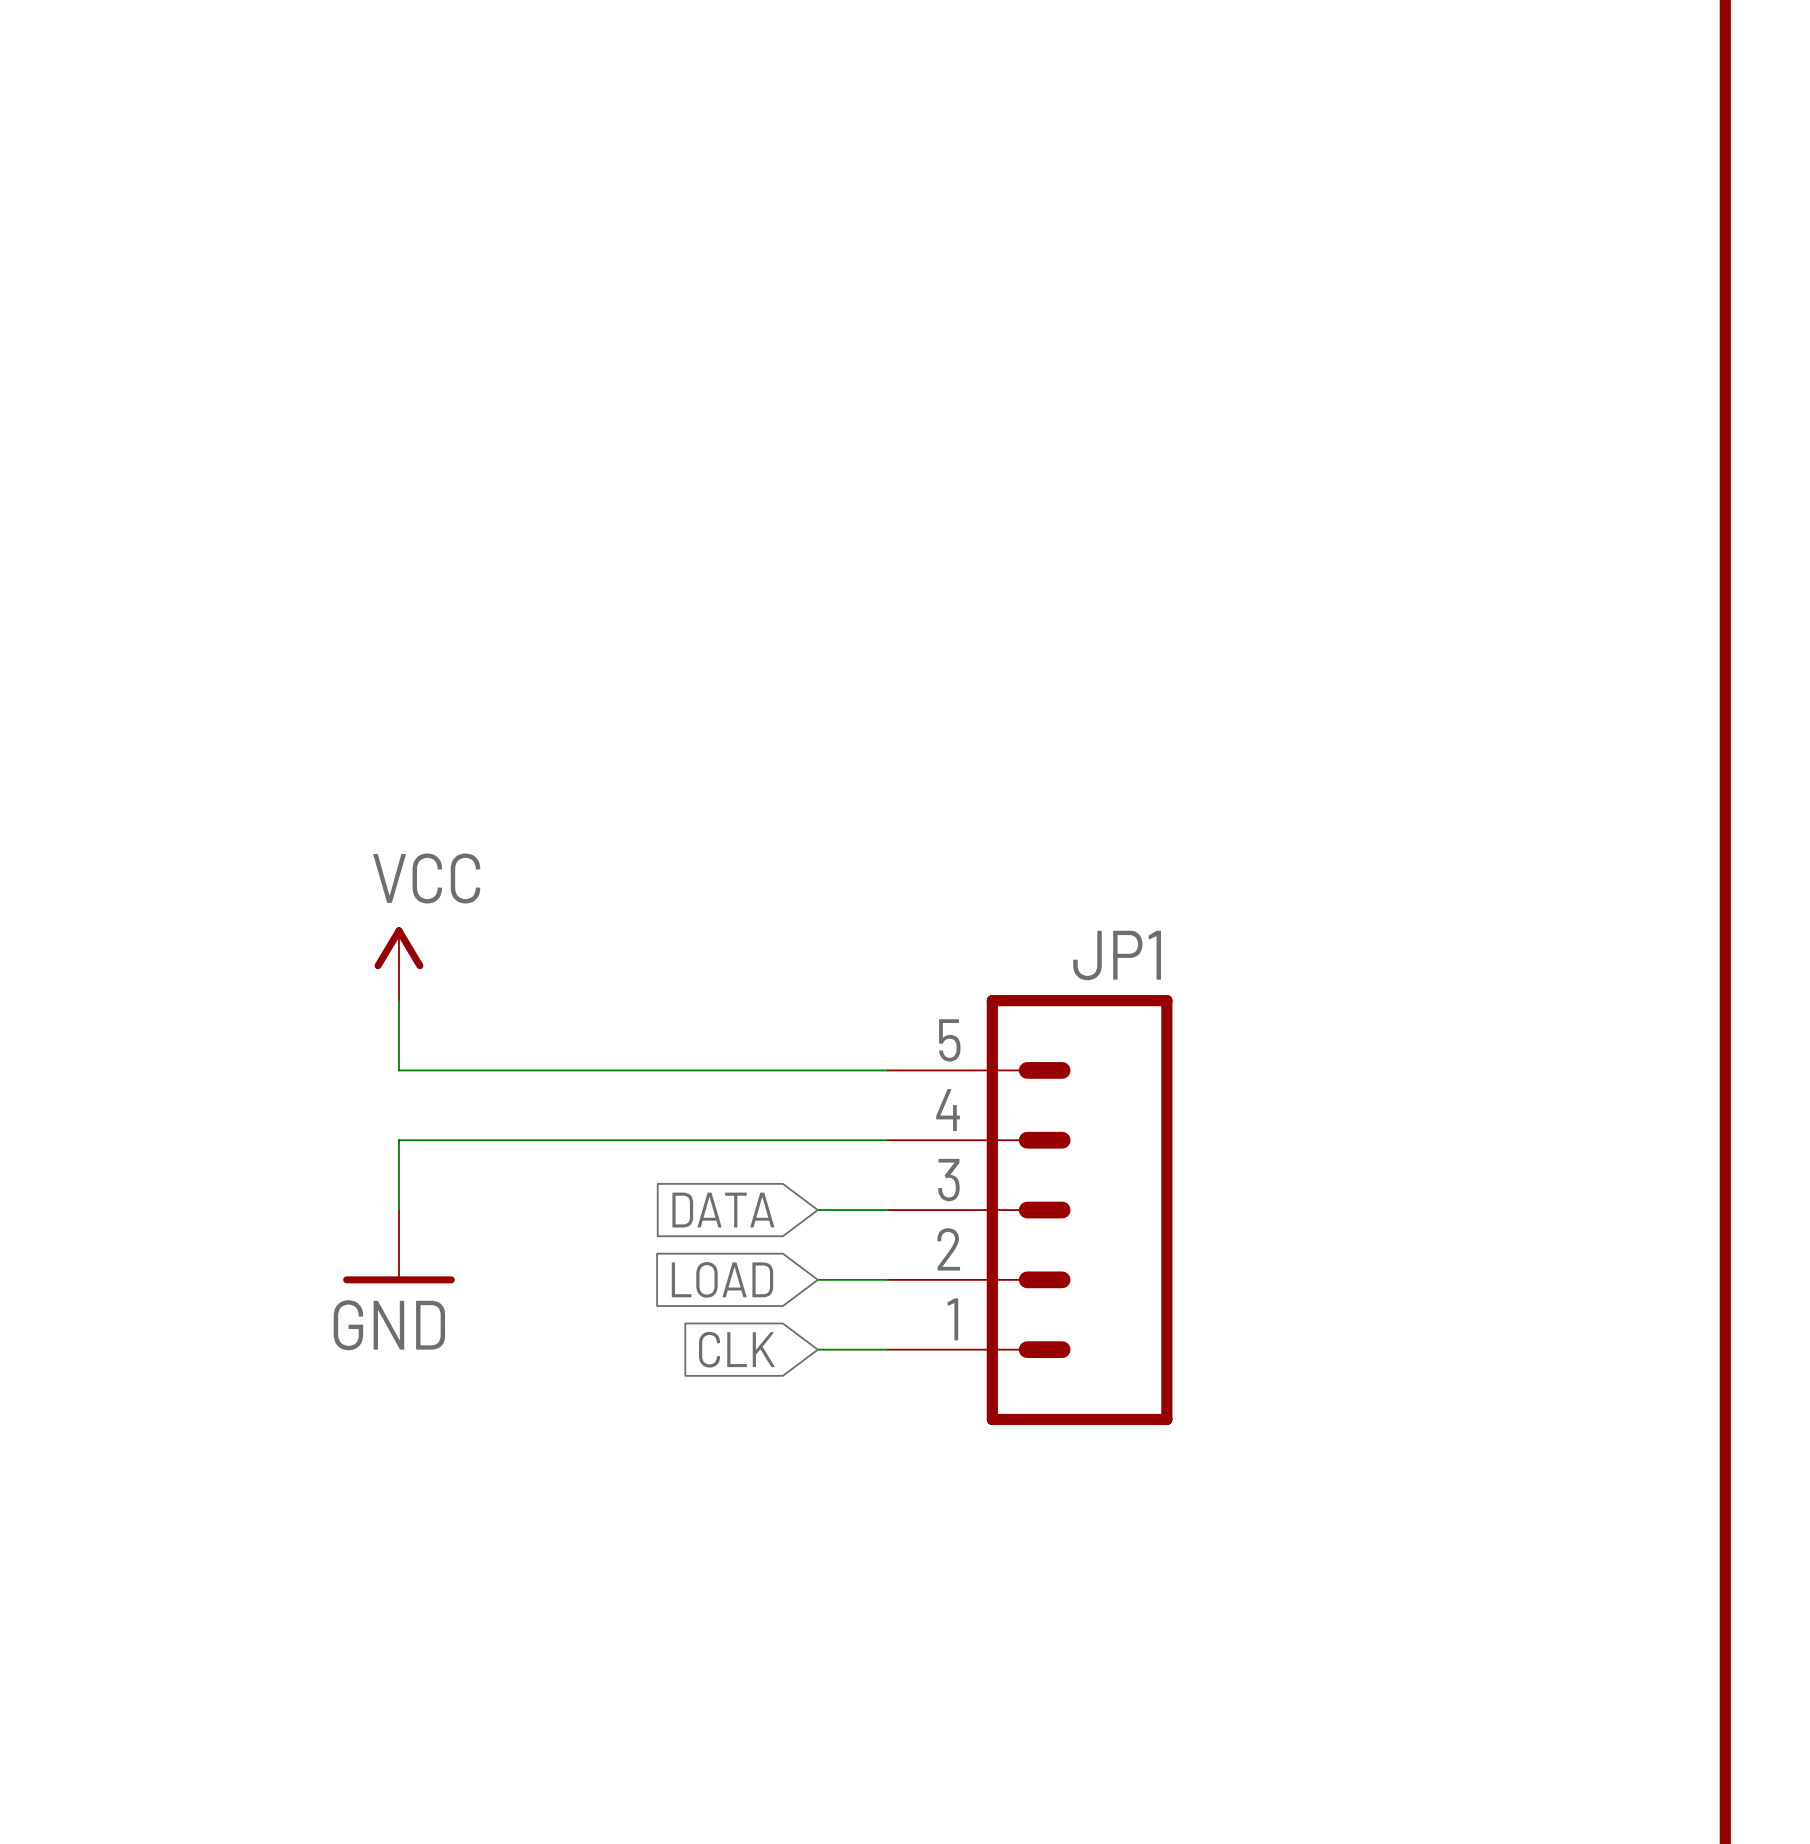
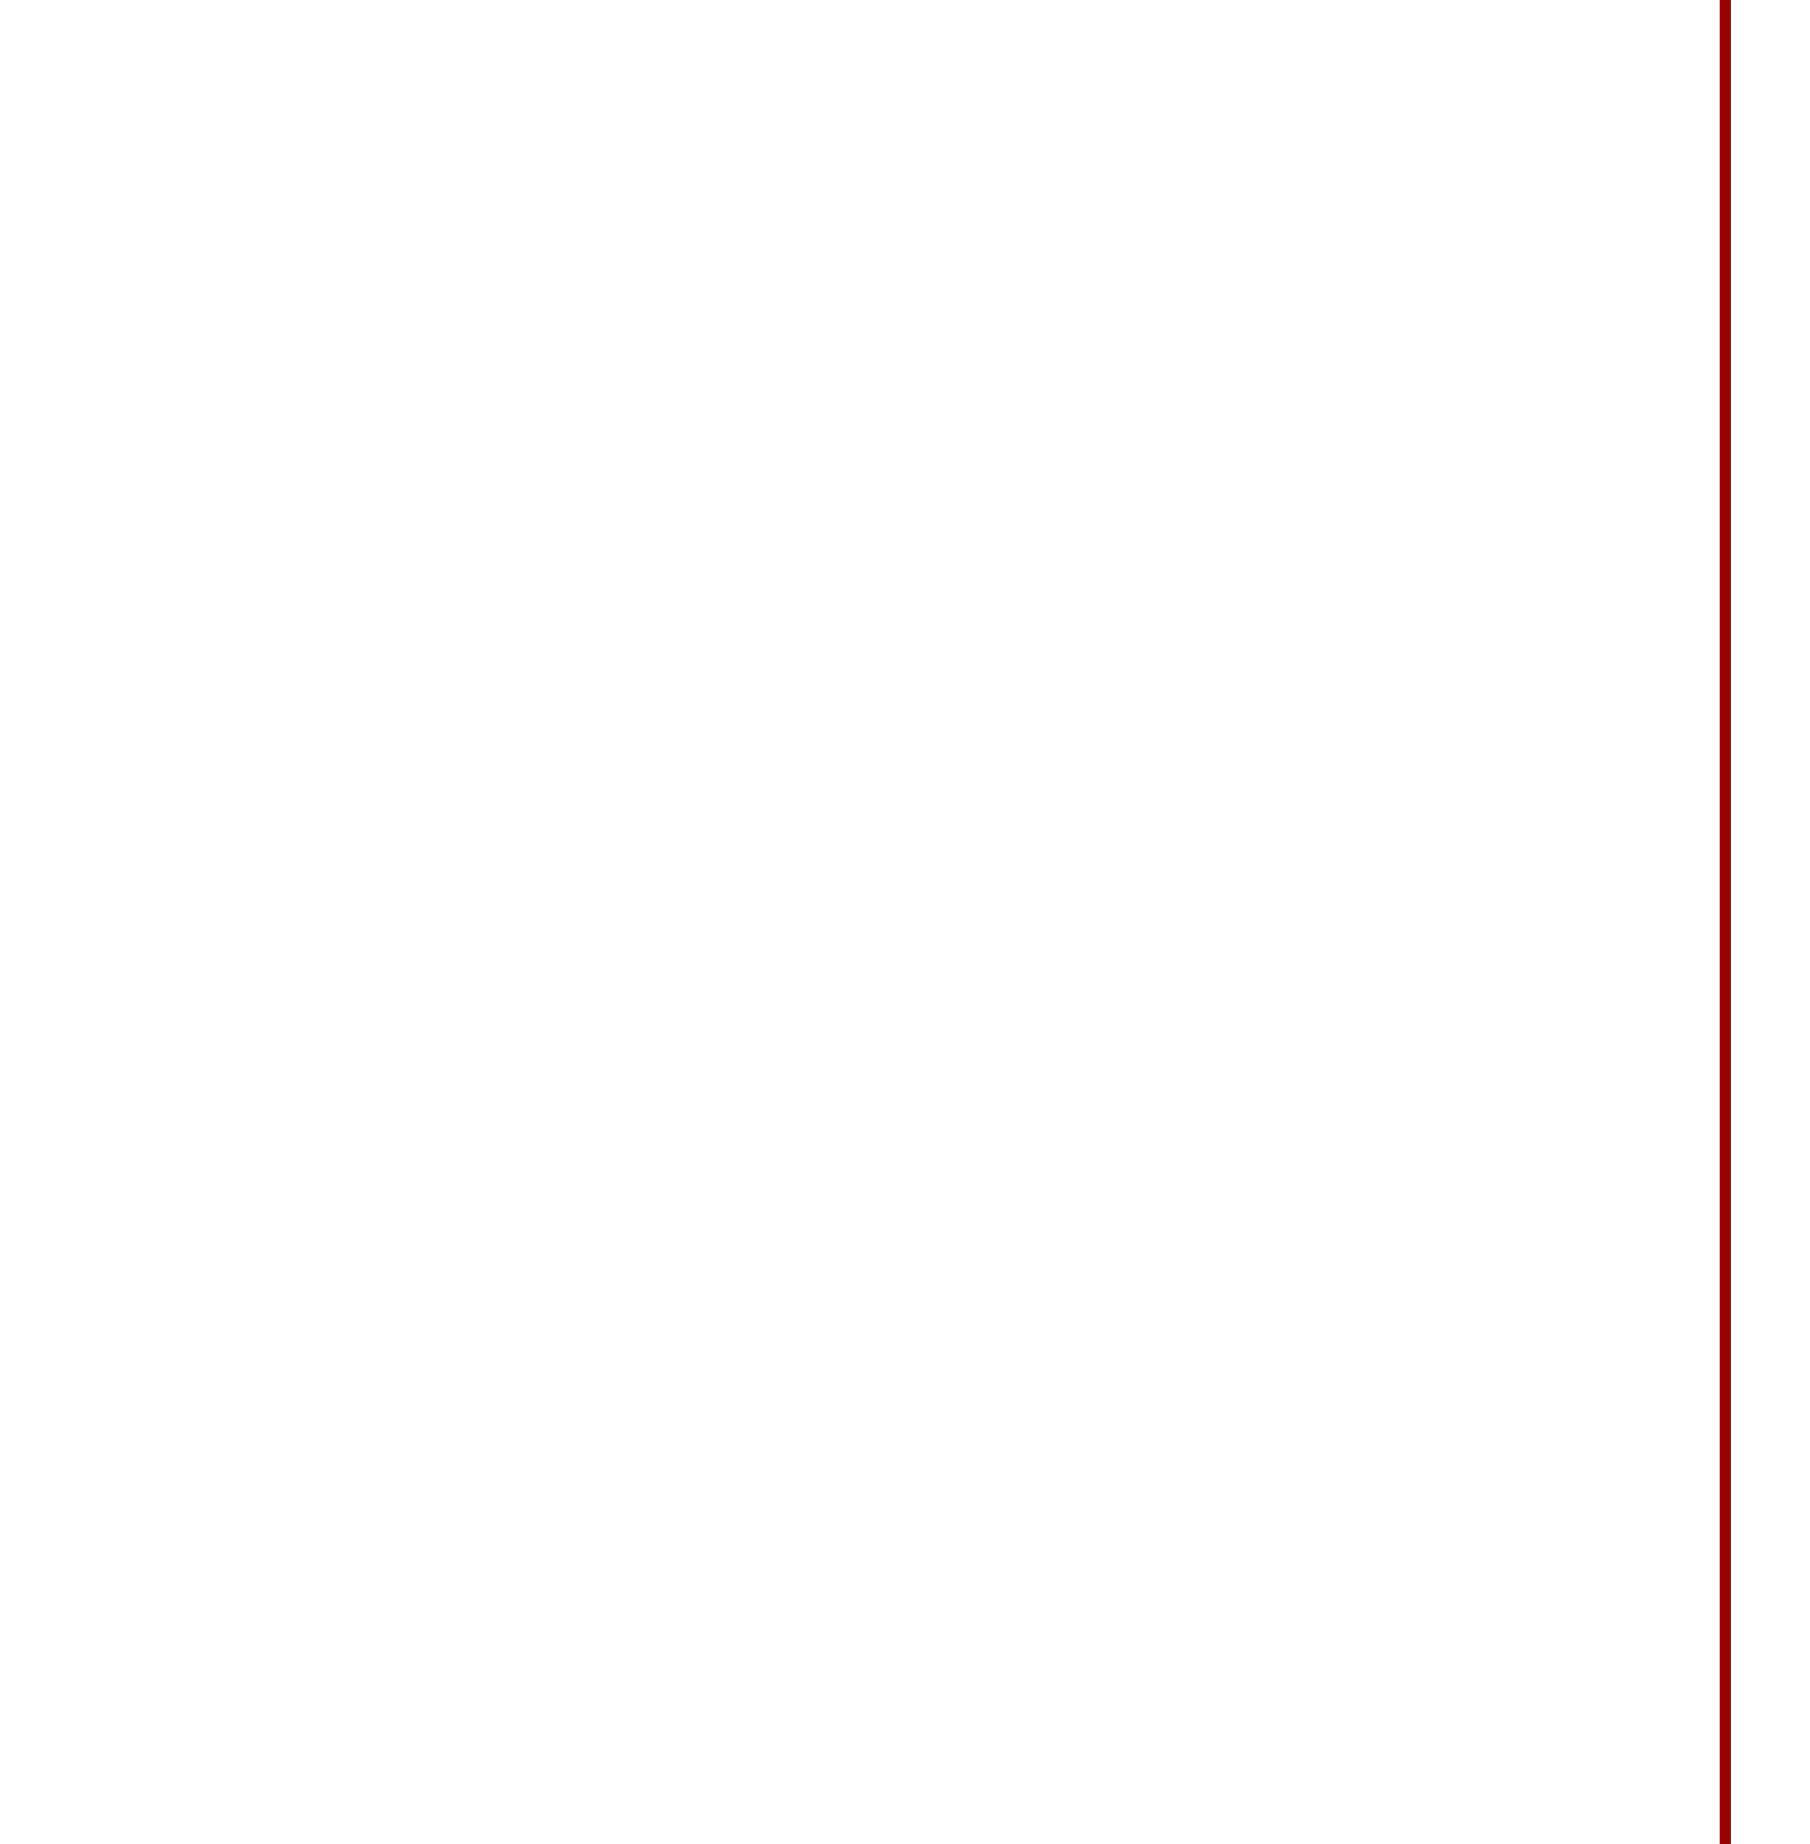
power symbol: VCC (398, 963) -> none
wire: (398, 1000) (398, 1070) (887, 1070) -> none
wire: (887, 1140) (398, 1140) (398, 1210) -> none
global label: DATA (723, 1210) -> none
wire: (817, 1210) (887, 1210) -> none
JP1: (1030, 1210) -> none
power symbol: GND (398, 1246) -> none
global label: LOAD (722, 1279) -> none
wire: (817, 1279) (887, 1279) -> none
global label: CLK (736, 1349) -> none
wire: (817, 1349) (887, 1349) -> none

